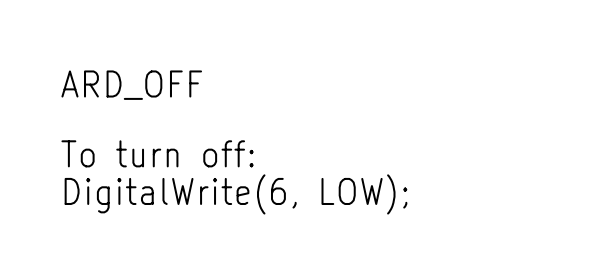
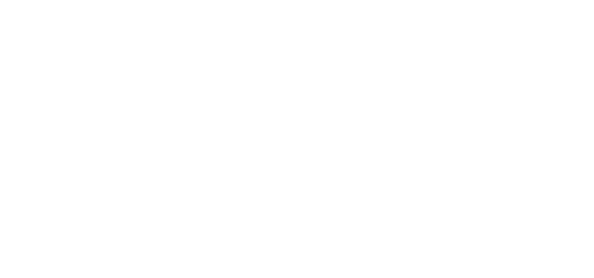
label: ARD_OFF (131, 85) -> none
text: To turn off: (157, 153) -> none
text: DigitalWrite(6, LOW); (235, 194) -> none

